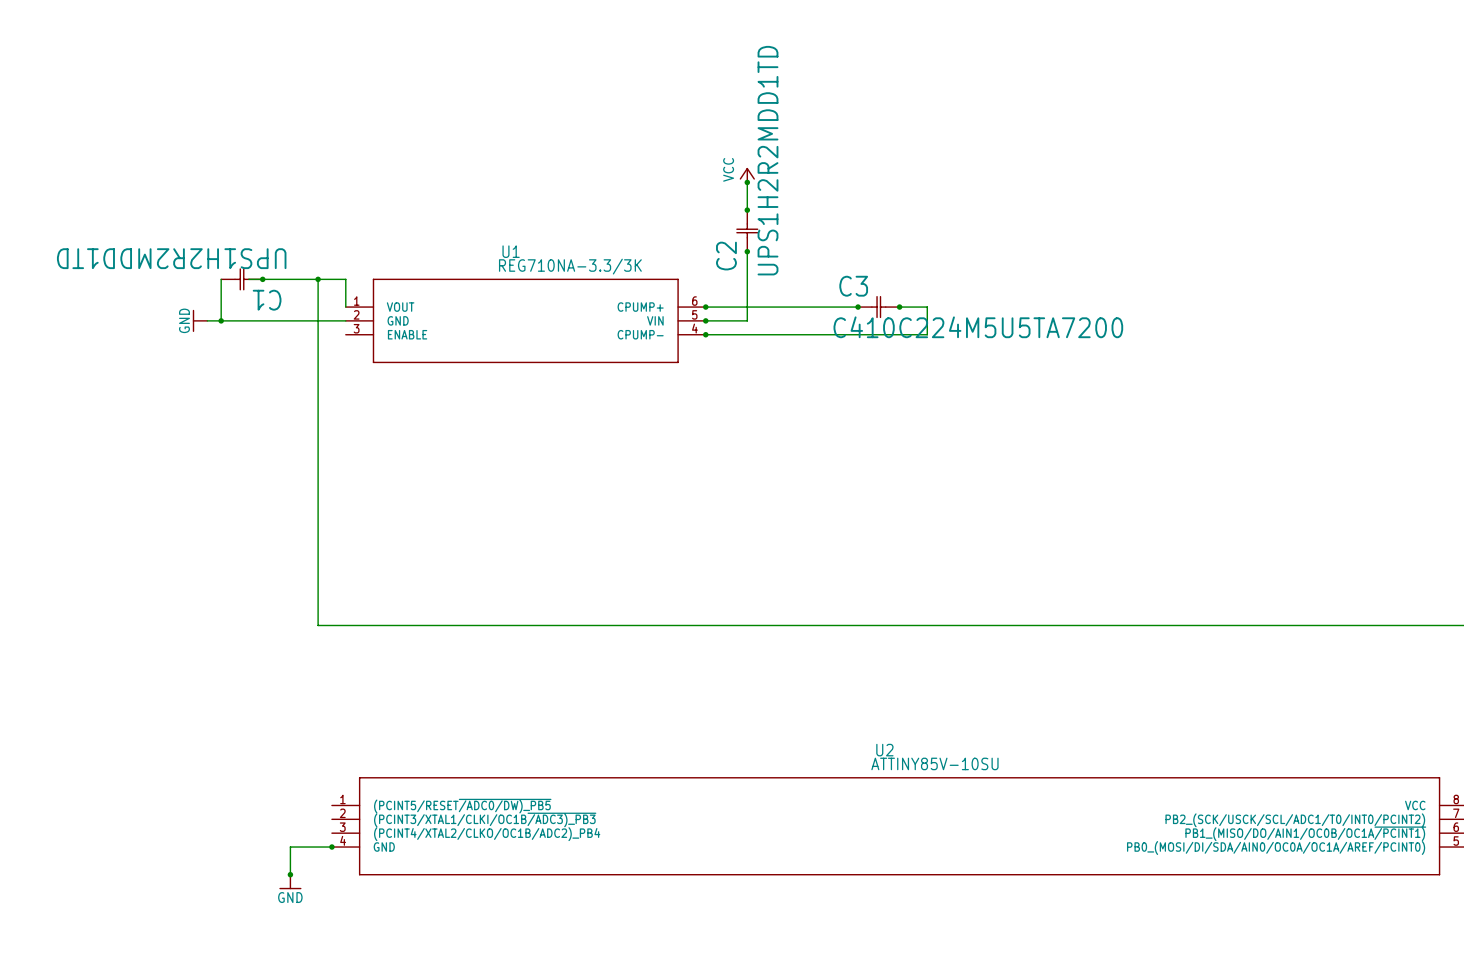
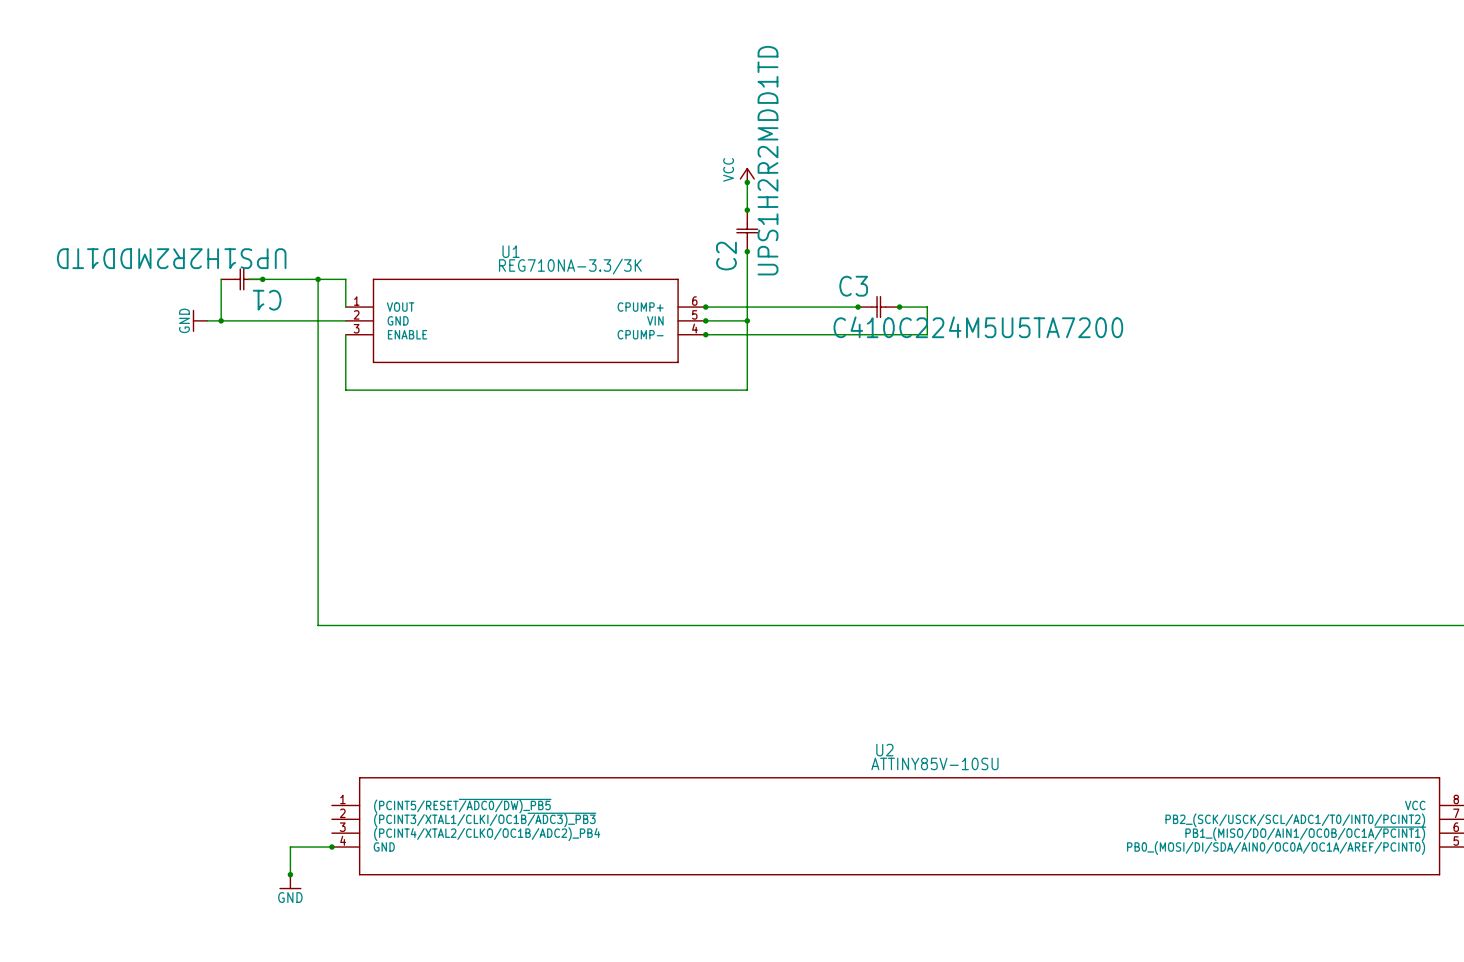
wire: none -> (747, 320) (747, 390) (345, 390) (345, 334)
junction: none -> (747, 320)

